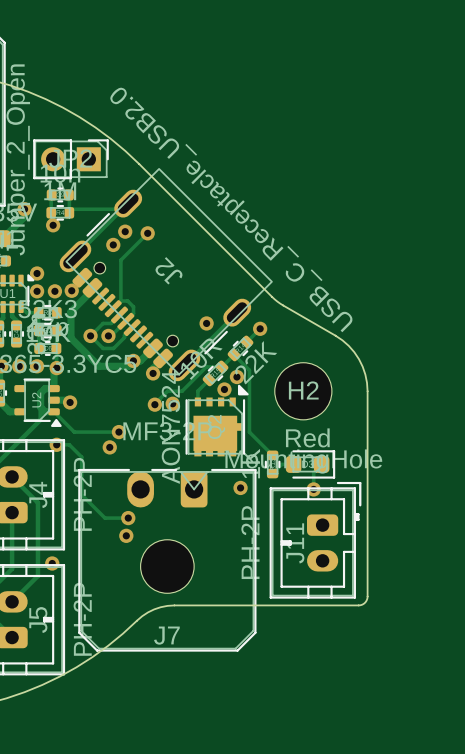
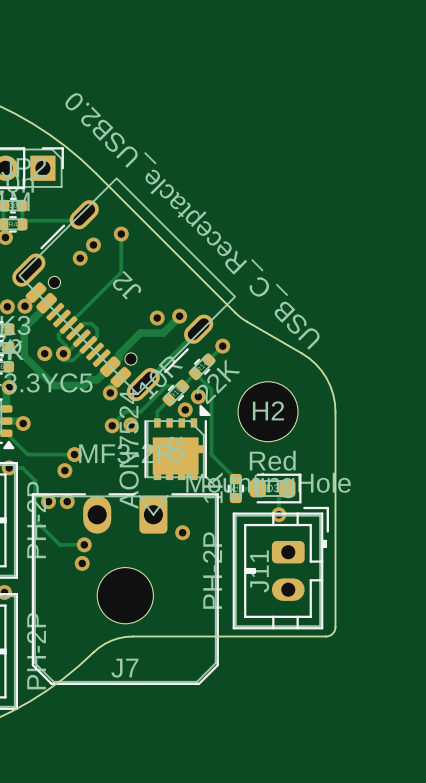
track: (122, 209) (75, 256) -> none
track: none -> (121, 234) (121, 272) (76, 316)
via: none -> (121, 234)
via: (125, 231) -> none
via: none -> (93, 245)
track: (147, 233) (120, 260) (120, 301) (127, 301) (133, 306) (133, 313) (125, 321) -> none
via: (147, 233) -> none
via: (113, 244) -> none
via: none -> (80, 258)
track: none -> (179, 316) (163, 333) (140, 333) (119, 354) (119, 357) (110, 366)
via: none -> (179, 316)
via: none -> (157, 318)
track: none -> (68, 325) (58, 334) (58, 338) (67, 346)
track: (119, 314) (111, 323) (103, 323) (90, 335) (103, 348) (113, 348) (124, 335) -> (75, 331) (83, 323) (91, 323) (97, 329) (97, 336) (88, 344)
via: (206, 323) -> none
track: none -> (80, 352) (72, 360) (62, 360)
via: (133, 360) -> none
via: none -> (48, 501)
via: none -> (67, 501)
via position: (240, 487) -> (182, 532)

